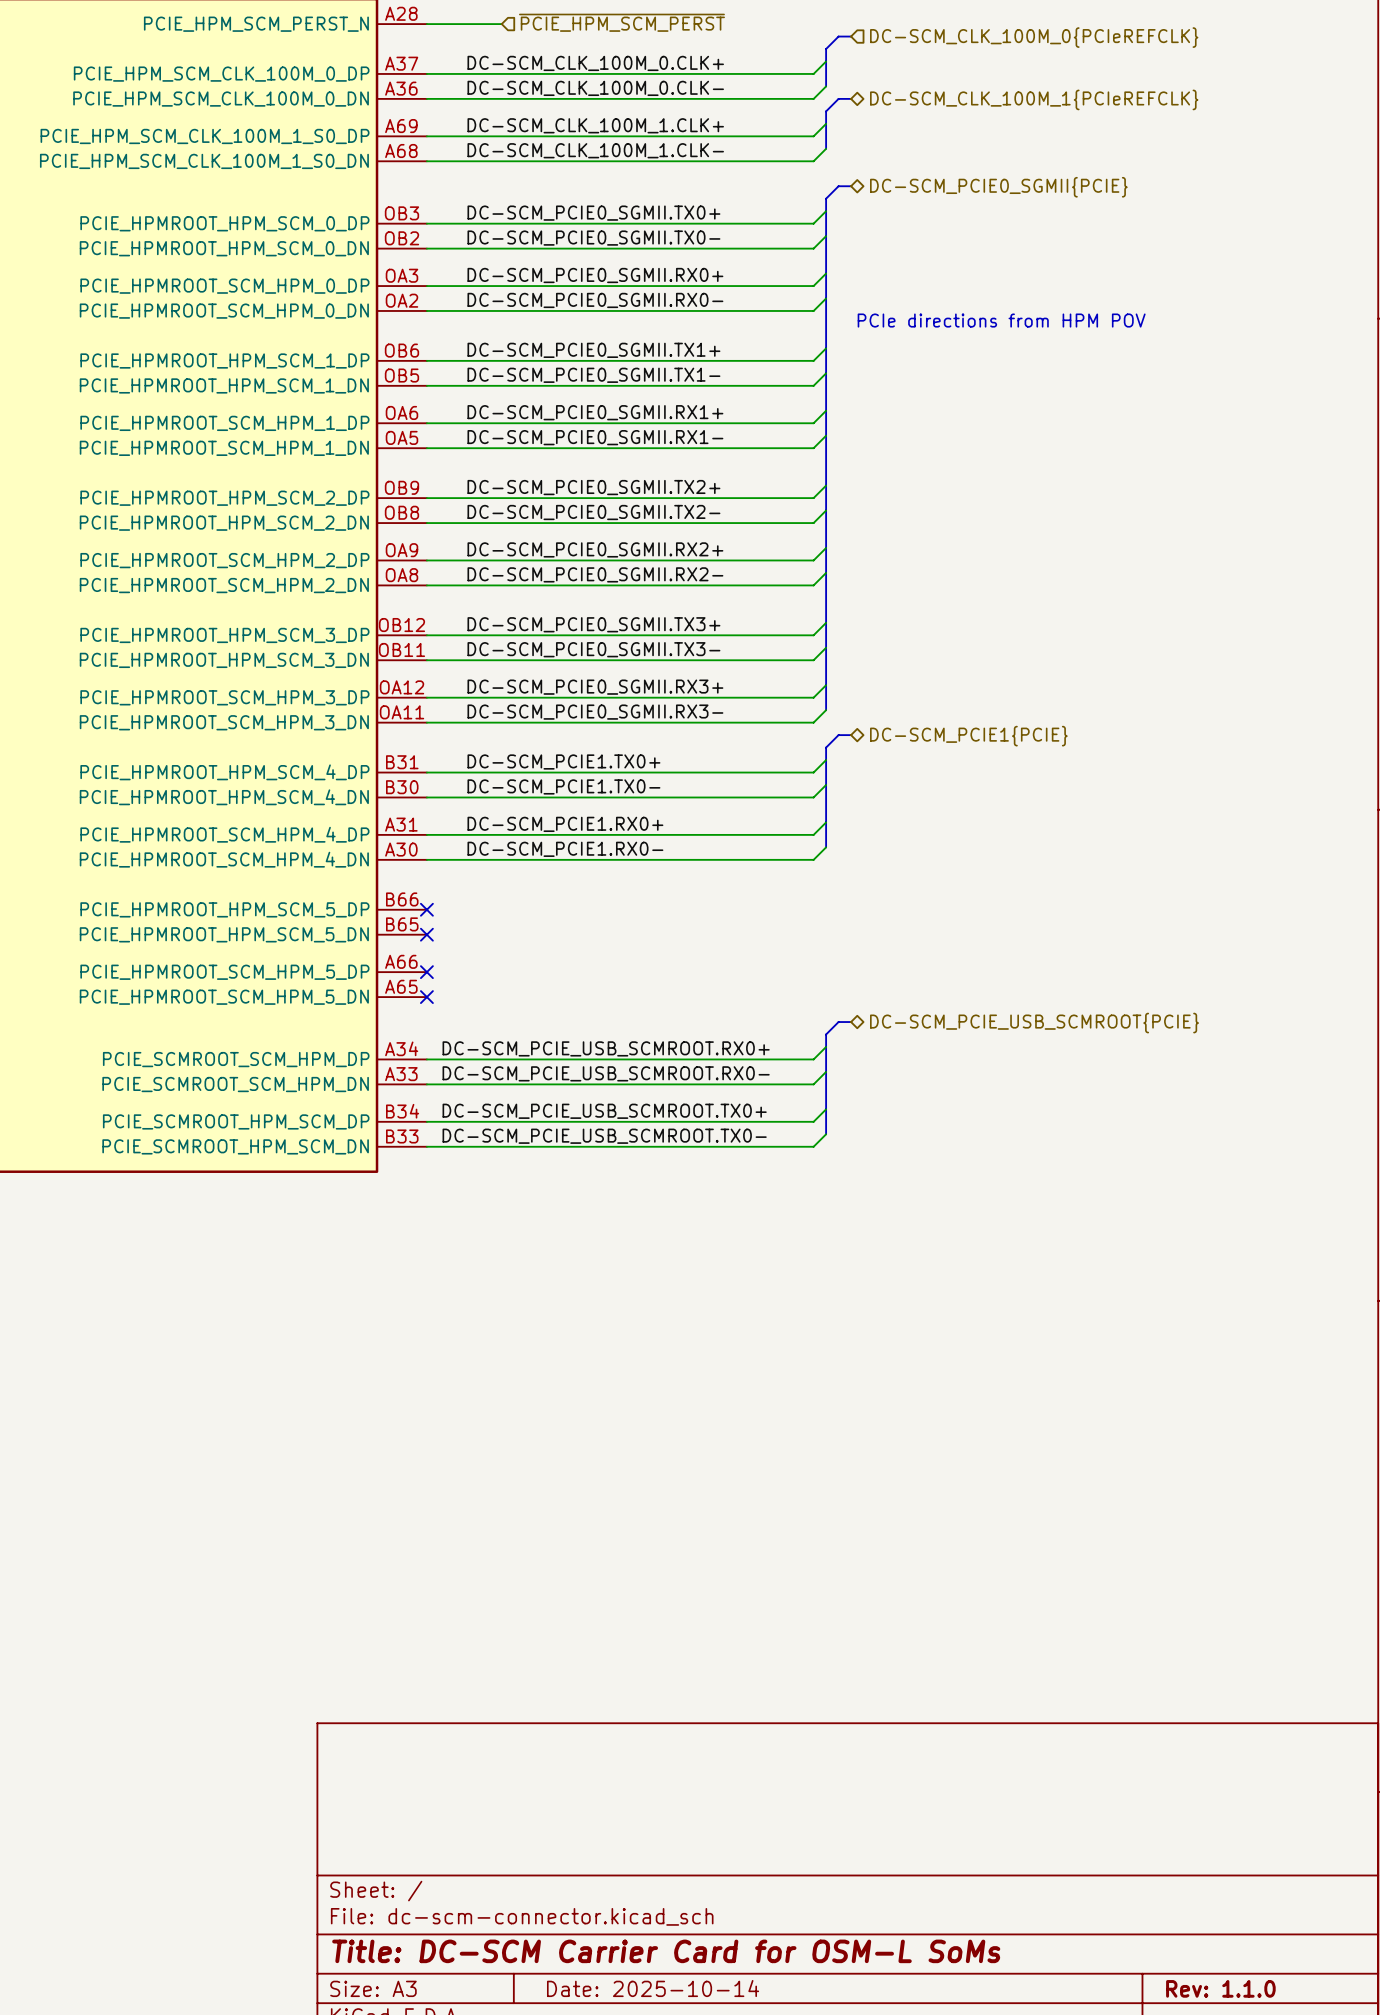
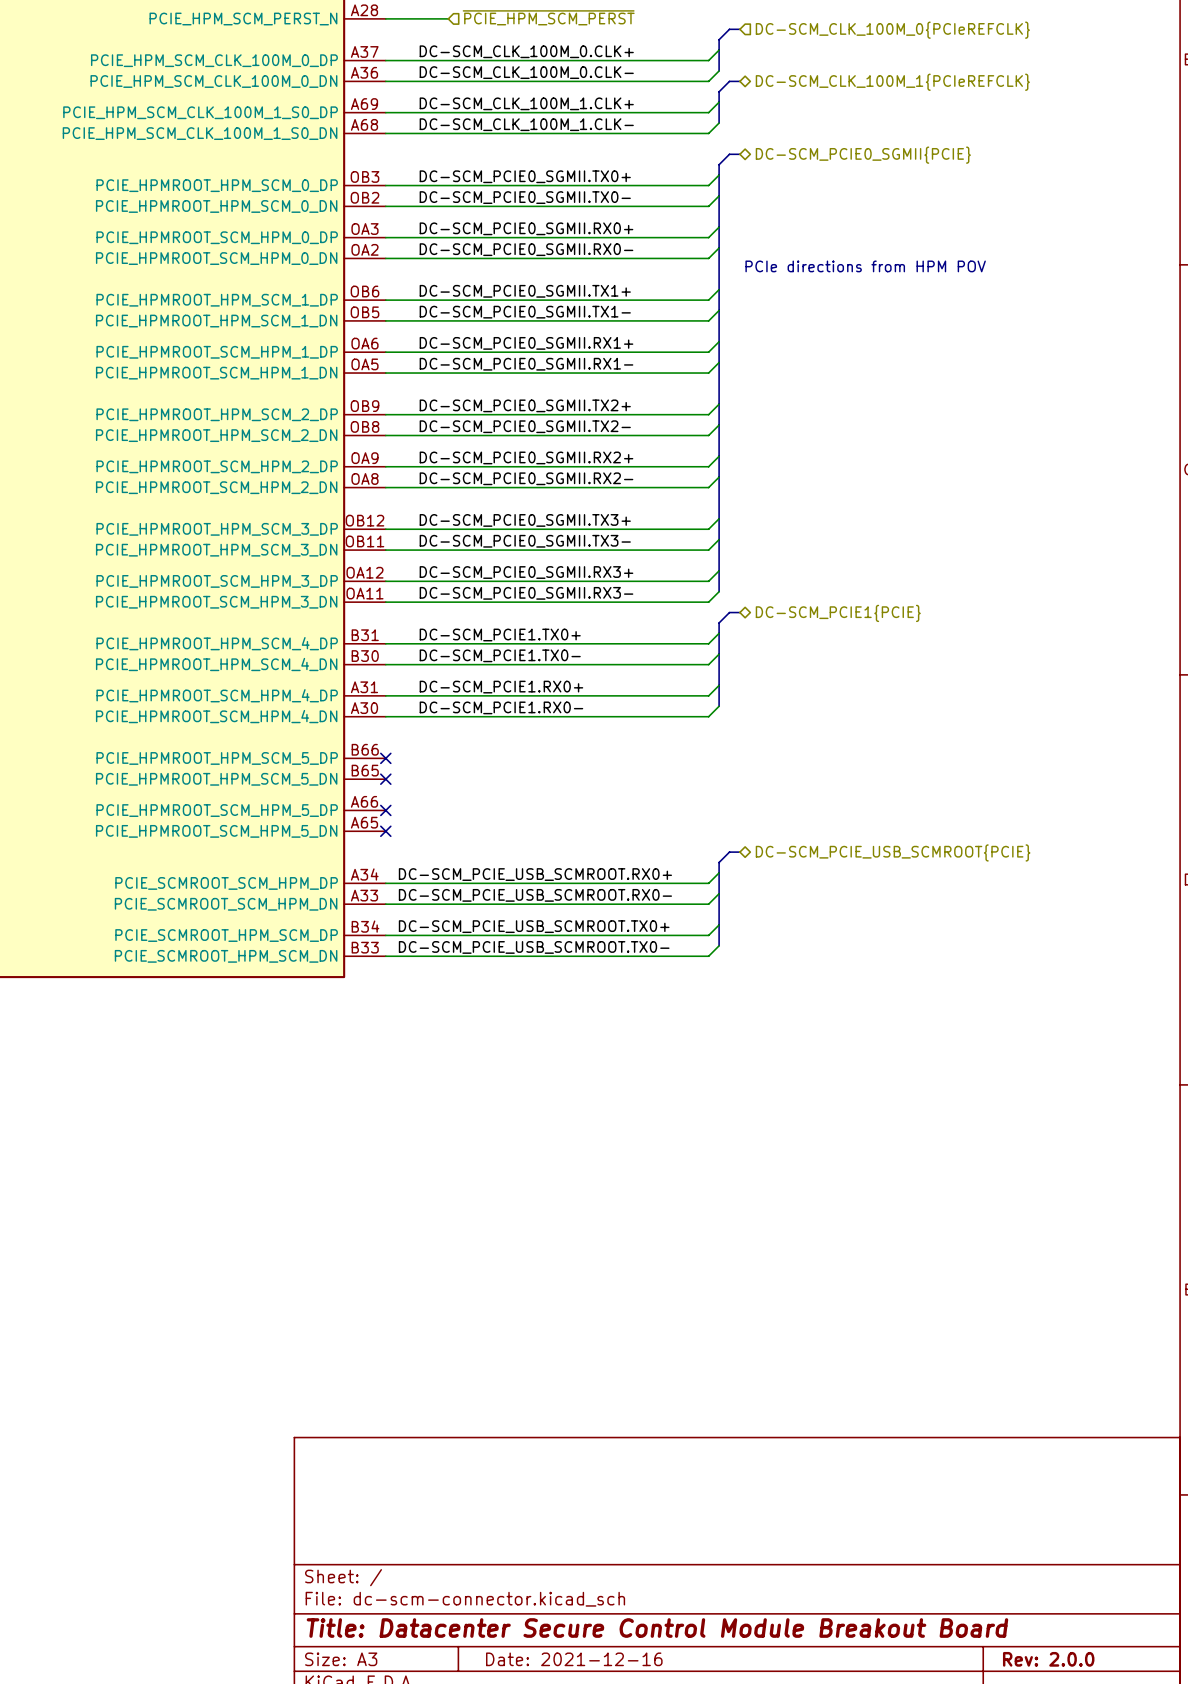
title block: Title: DC-SCM Carrier Card for OSM-L SoMs (666, 1951) -> Title: Datacenter Secure Control Module Breakout Board (657, 1628)
title block: Date: 2025-10-14 (653, 1988) -> Date: 2021-12-16 (574, 1659)
title block: Rev: 1.1.0 (1220, 1988) -> Rev: 2.0.0 (1048, 1659)

